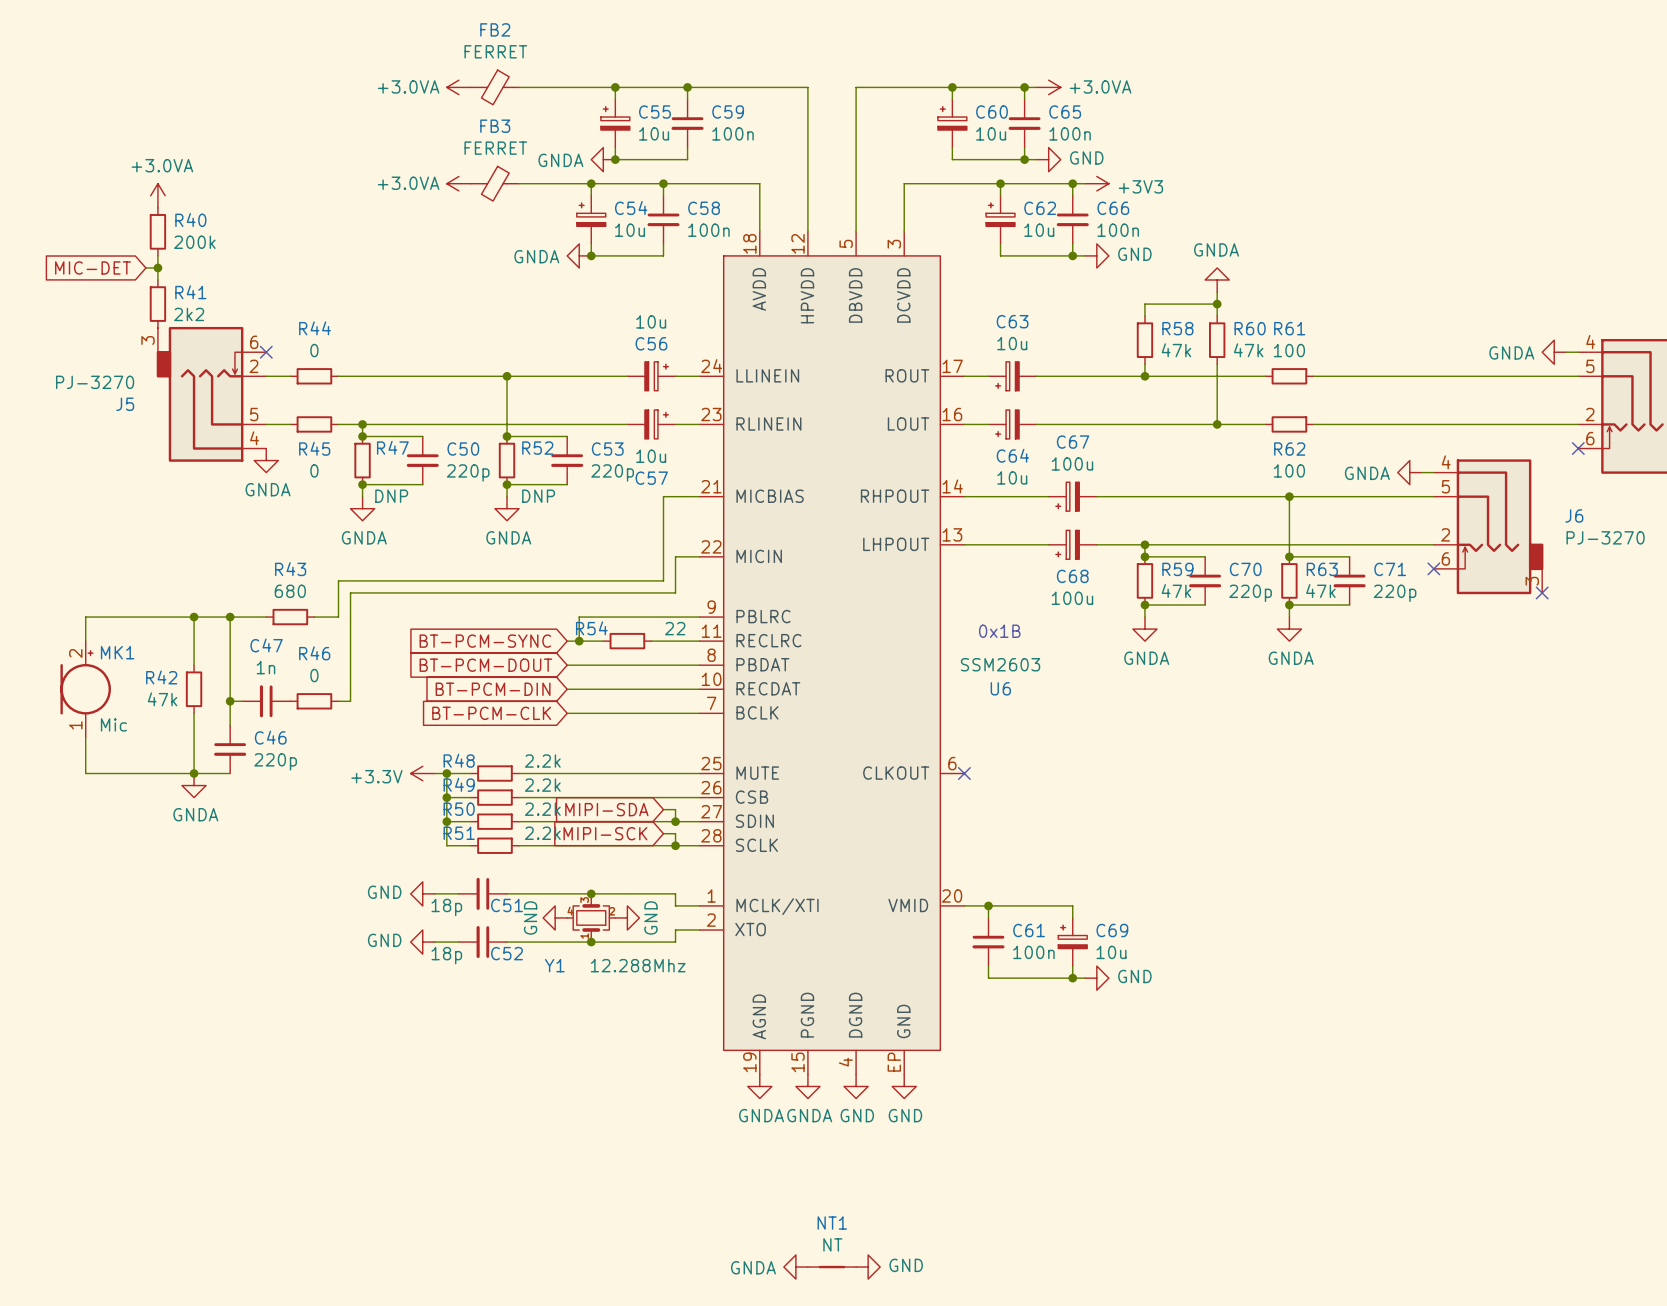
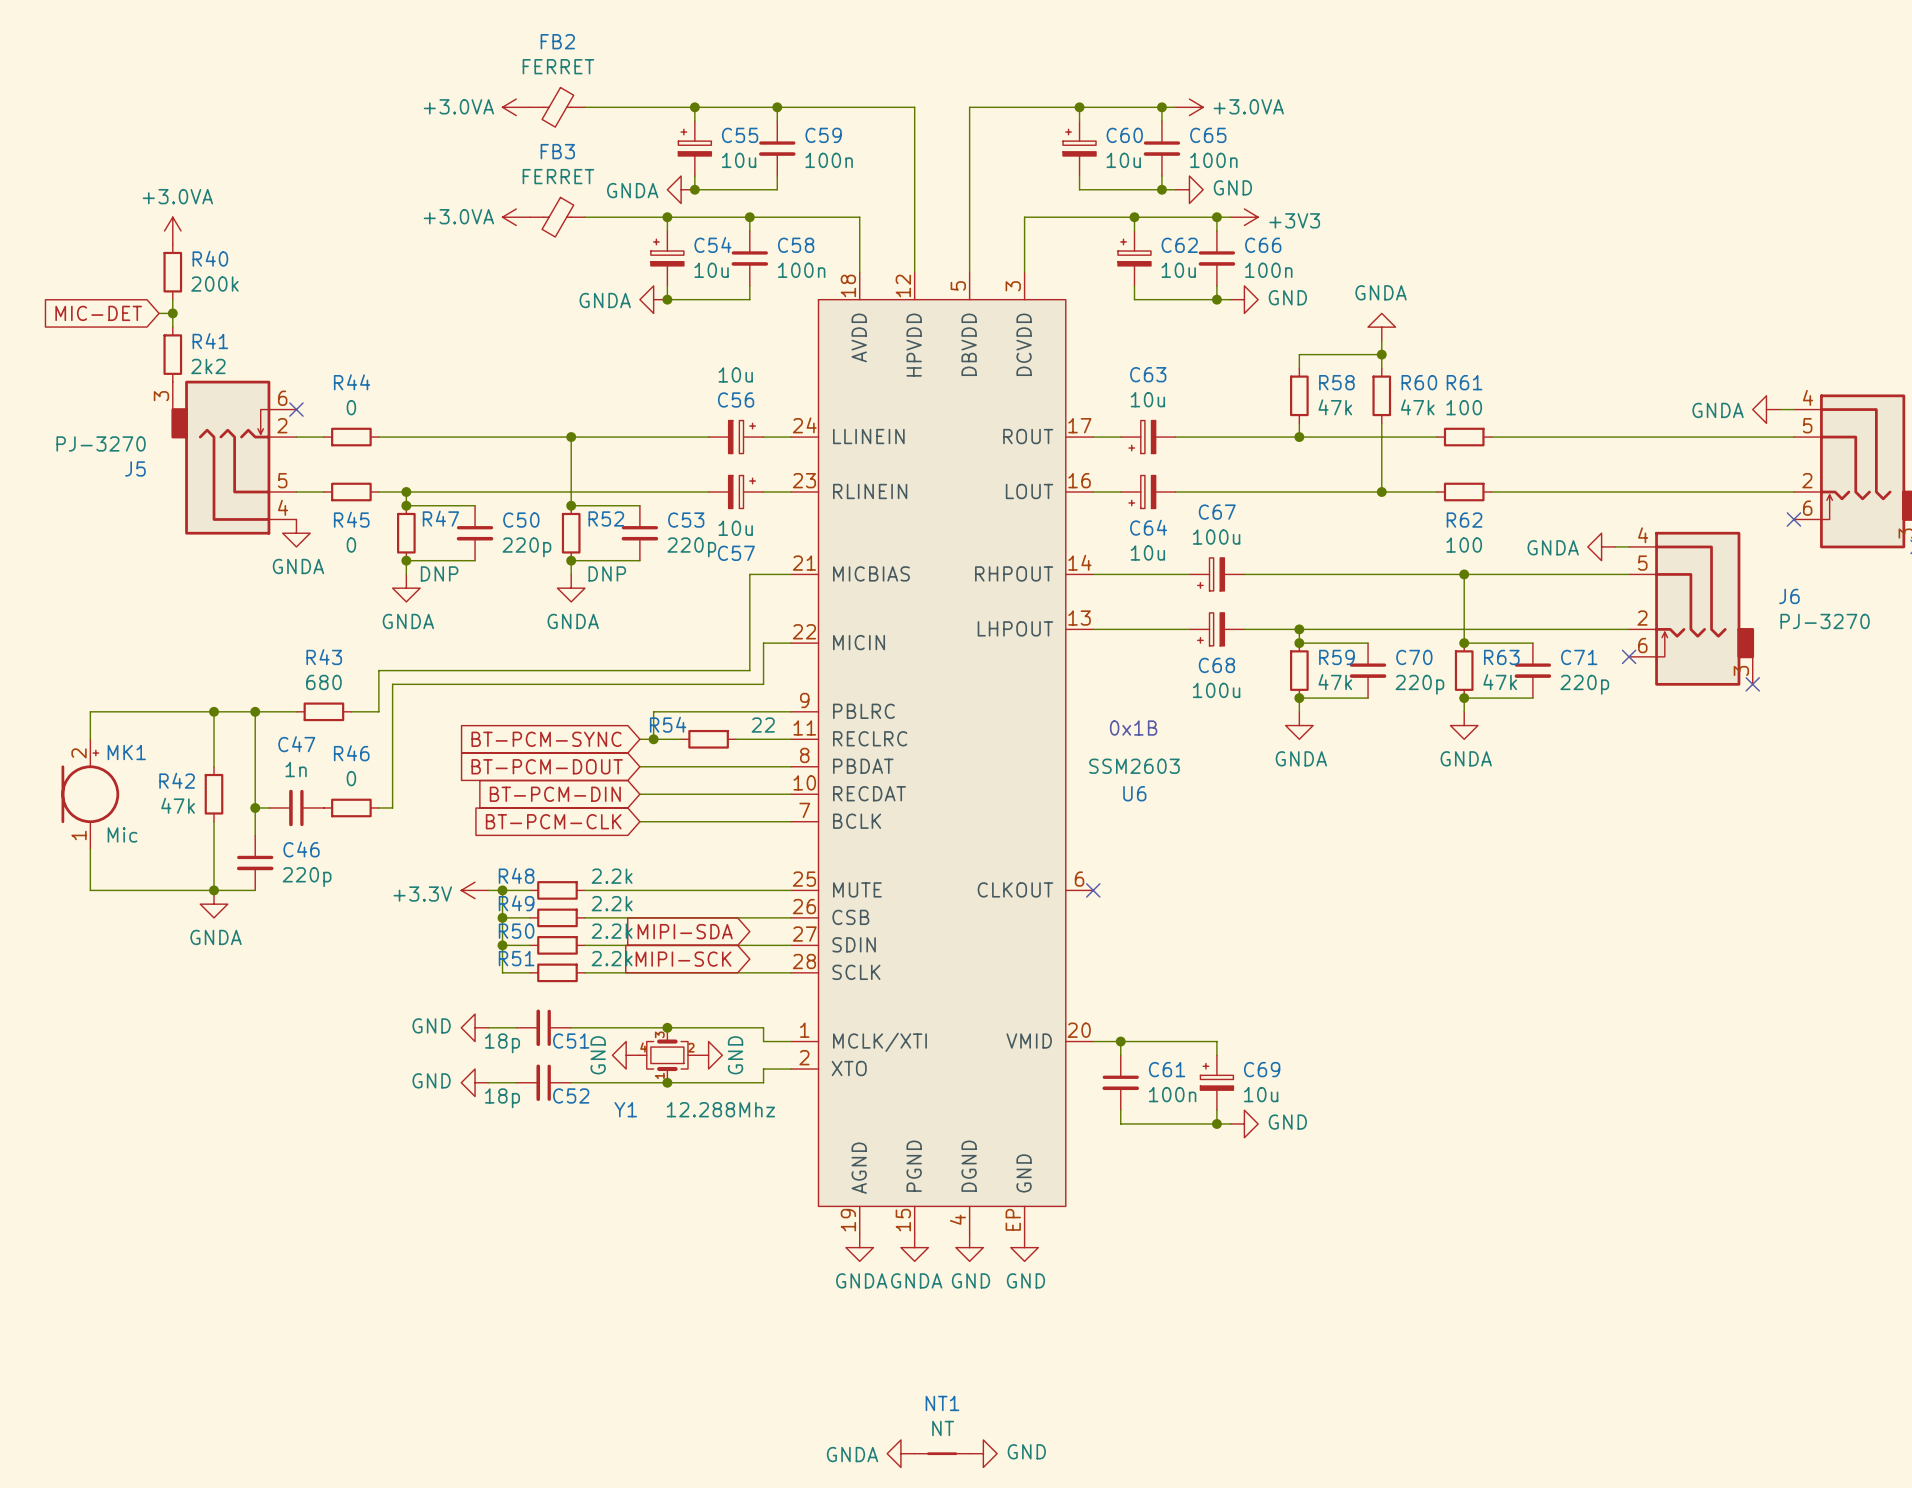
wire: (663, 809) (675, 809) (675, 821) -> none
junction: (675, 821) -> none
wire: (663, 833) (675, 833) (675, 845) -> none
junction: (675, 845) -> none

